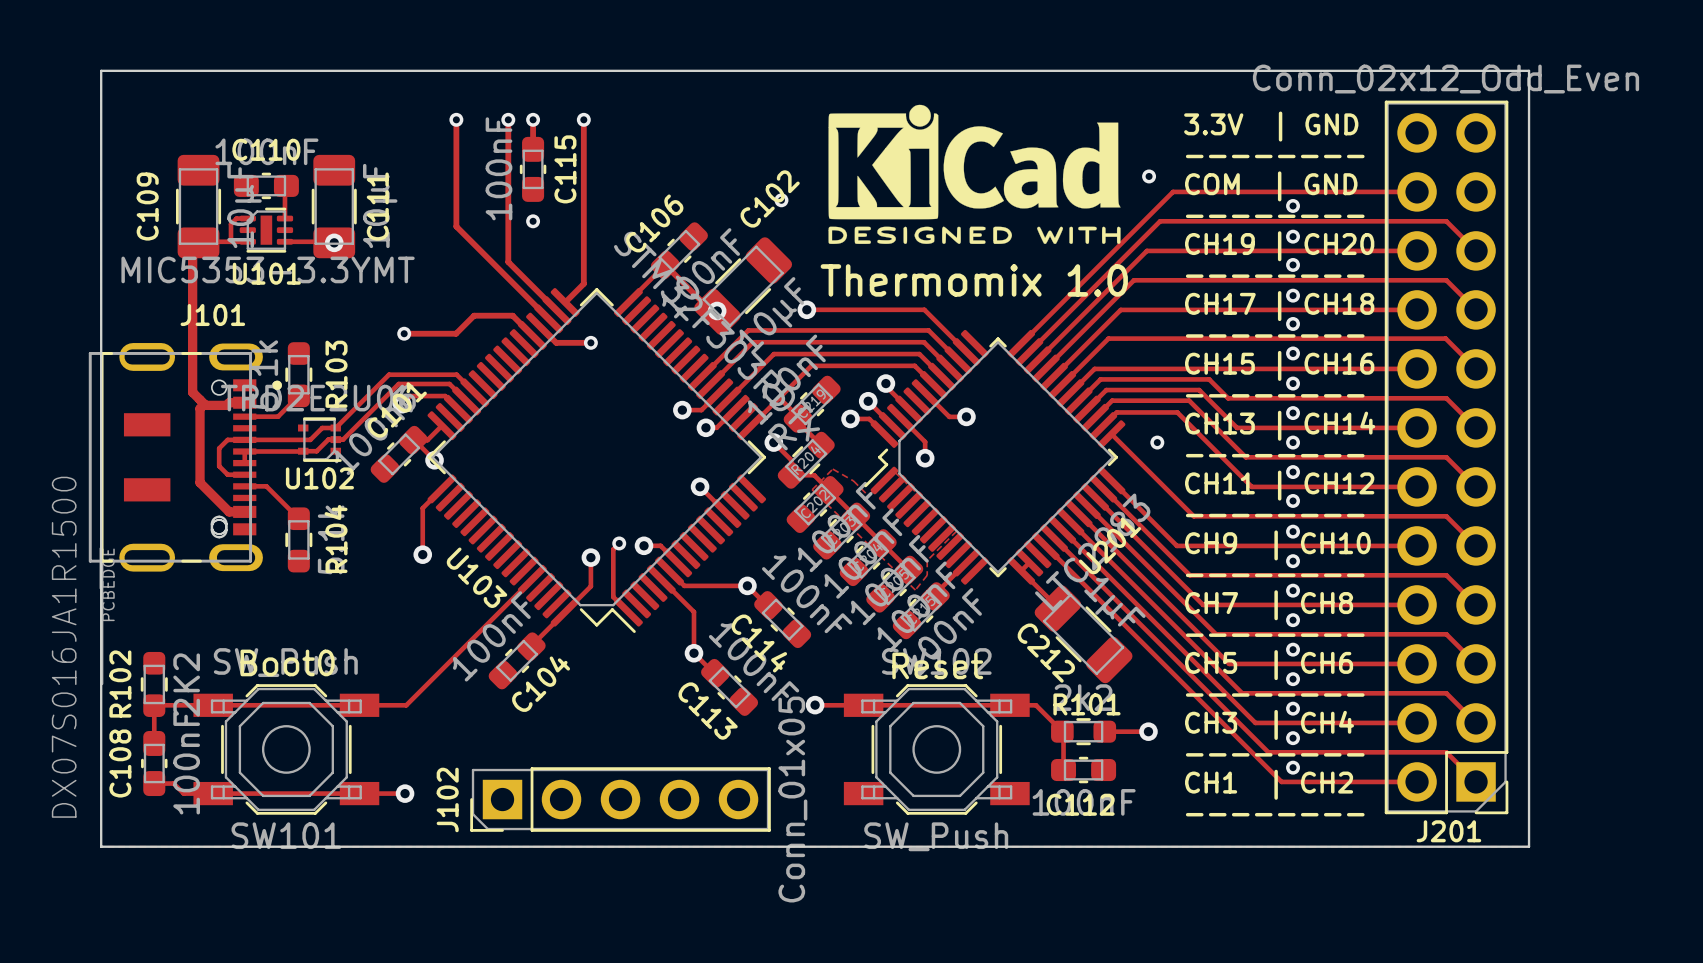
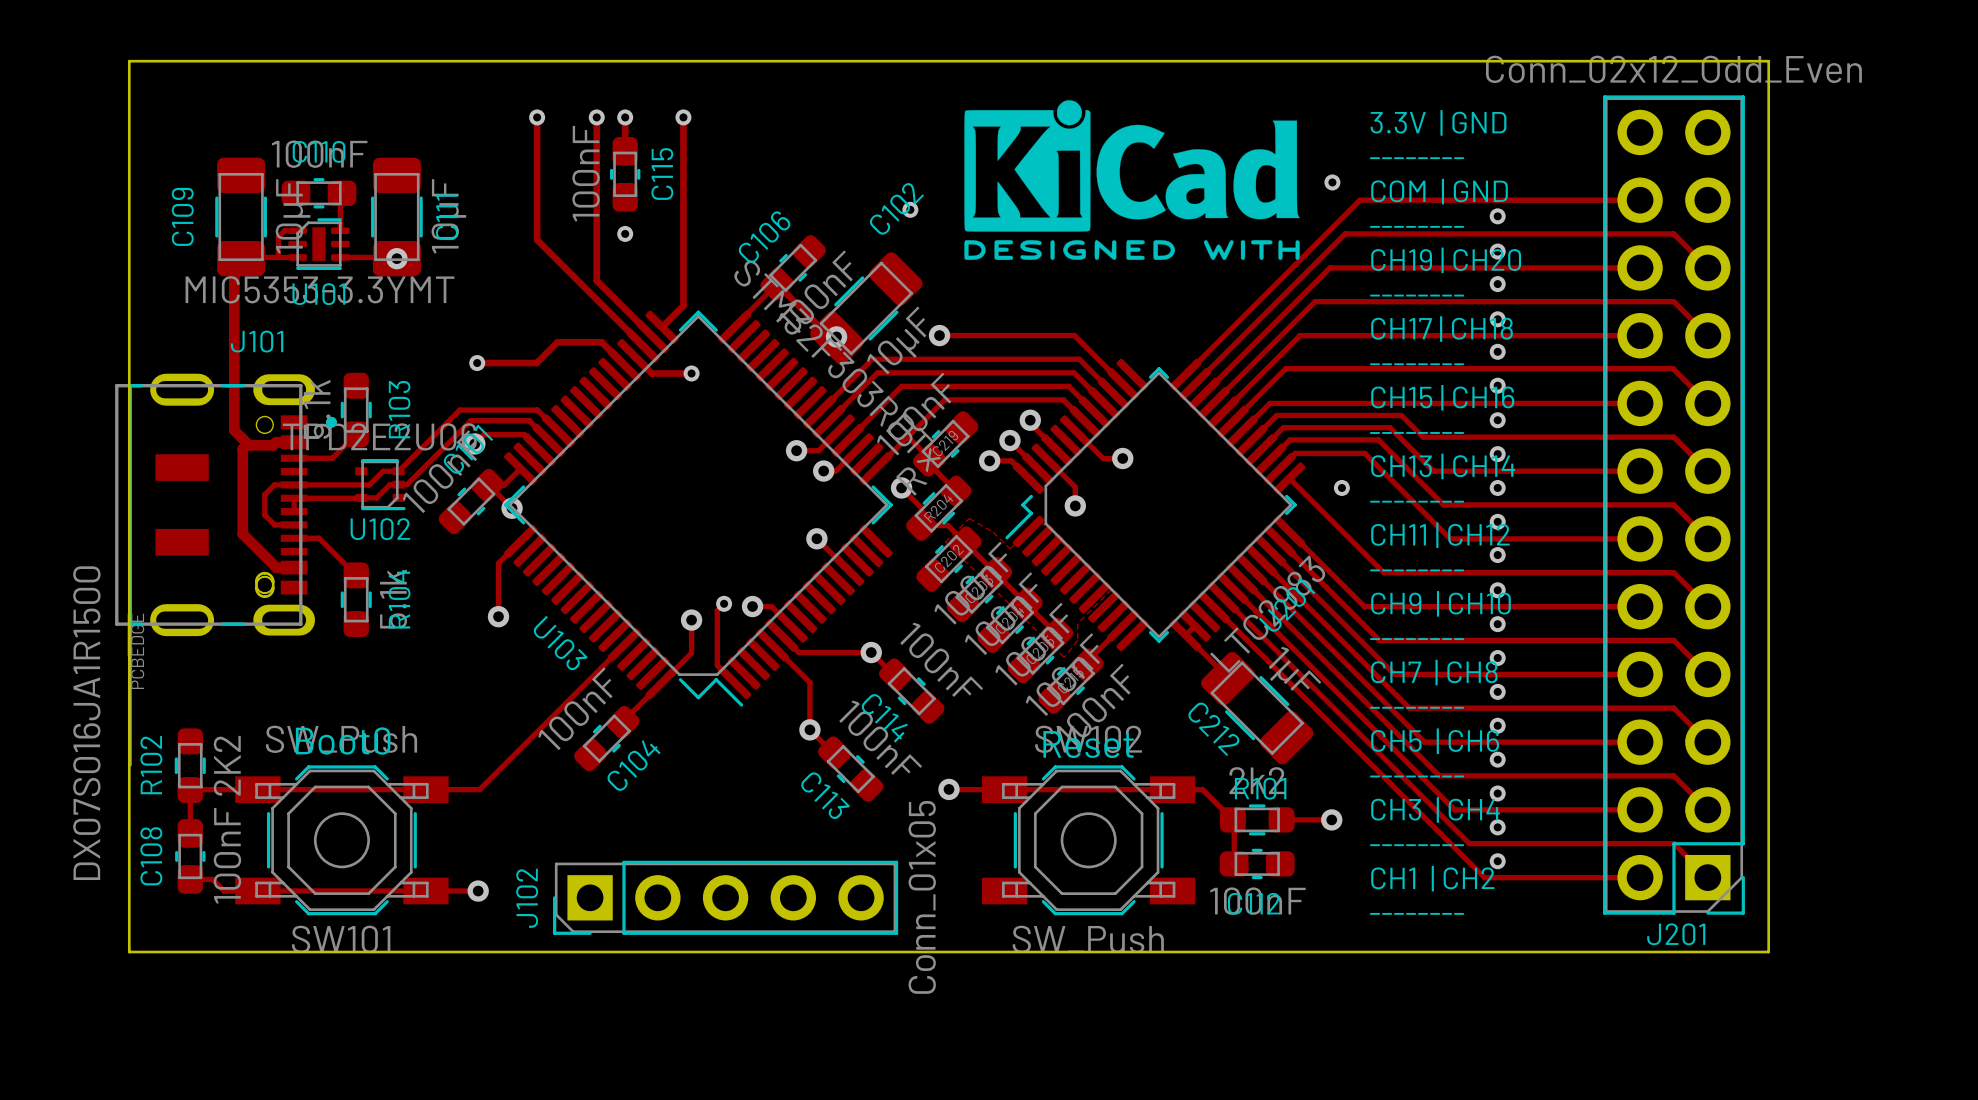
text: Thermomix 1.0 (974, 280) -> none

